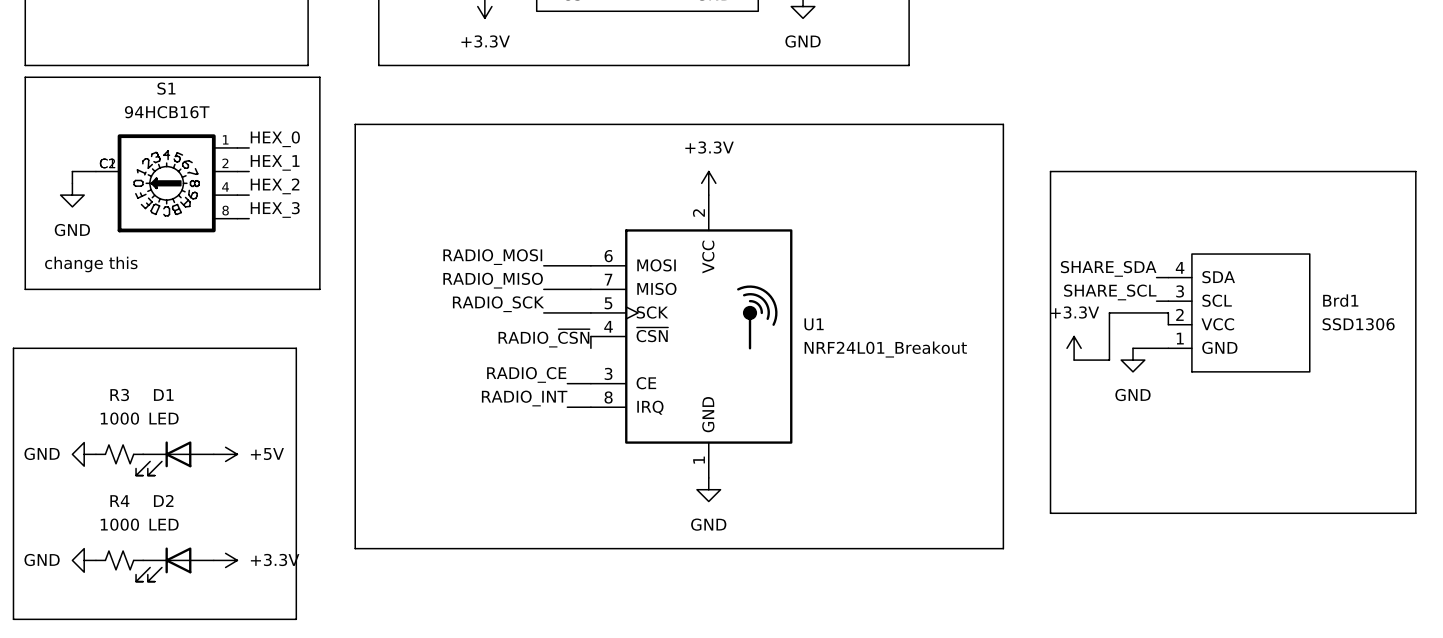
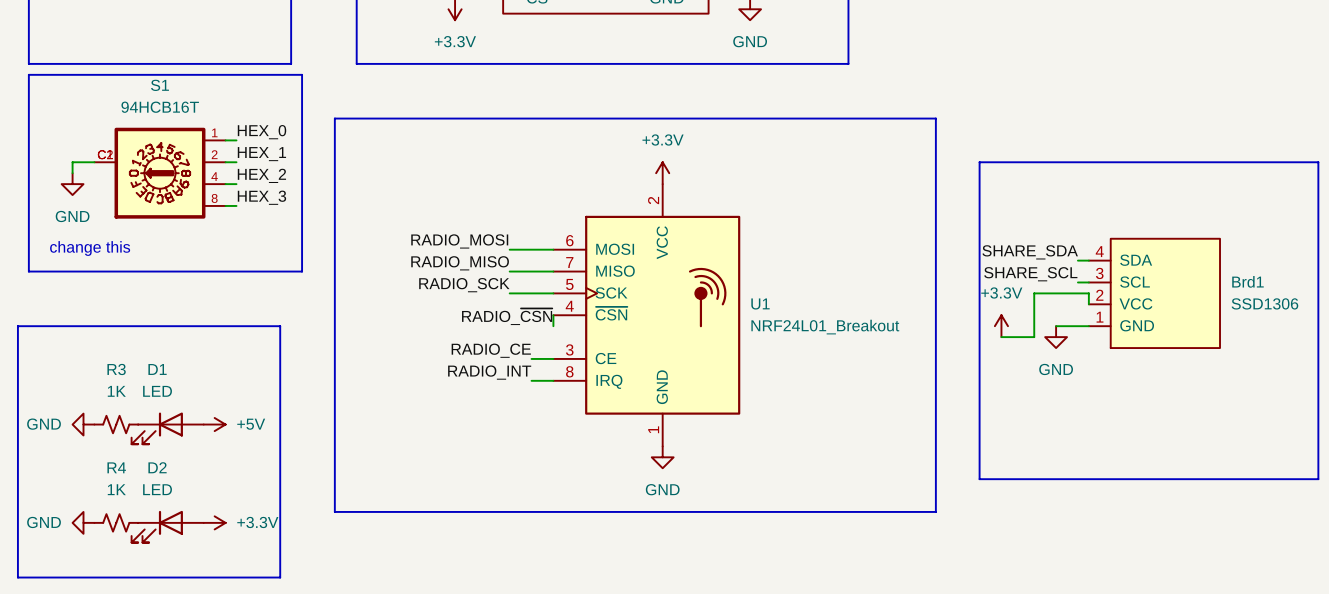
R3 value: 1000 (119, 418) -> 1K (116, 391)
R4 value: 1000 (119, 524) -> 1K (116, 489)

